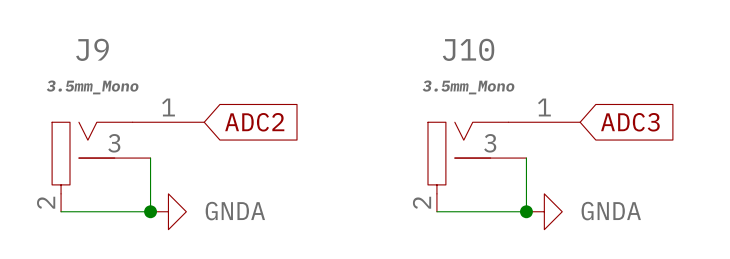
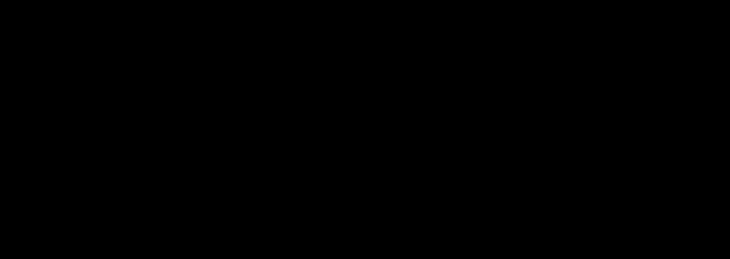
global label: ADC2 (254, 122) -> none
global label: ADC3 (630, 122) -> none
wire: (150, 158) (150, 211) (61, 211) -> none
wire: (526, 158) (526, 211) (436, 211) -> none
J9: (128, 167) -> none
J10: (504, 167) -> none
junction: (150, 211) -> none
power symbol: GNDA (168, 211) -> none
junction: (526, 211) -> none
power symbol: GNDA (544, 211) -> none

